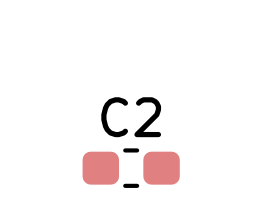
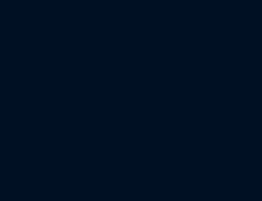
C2: (131, 168) -> none

